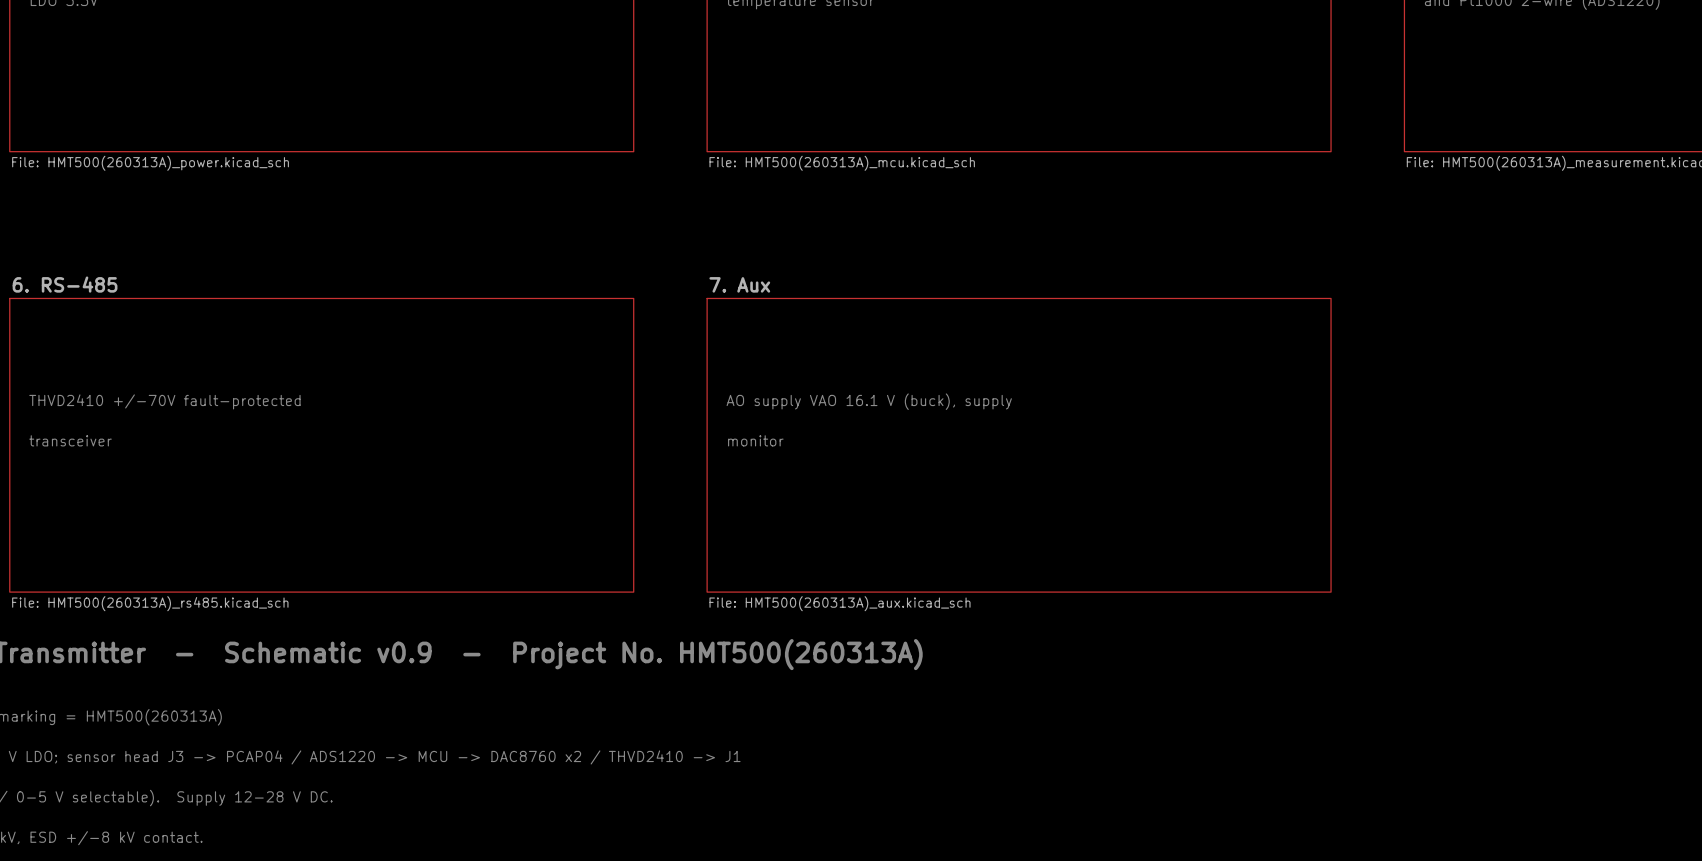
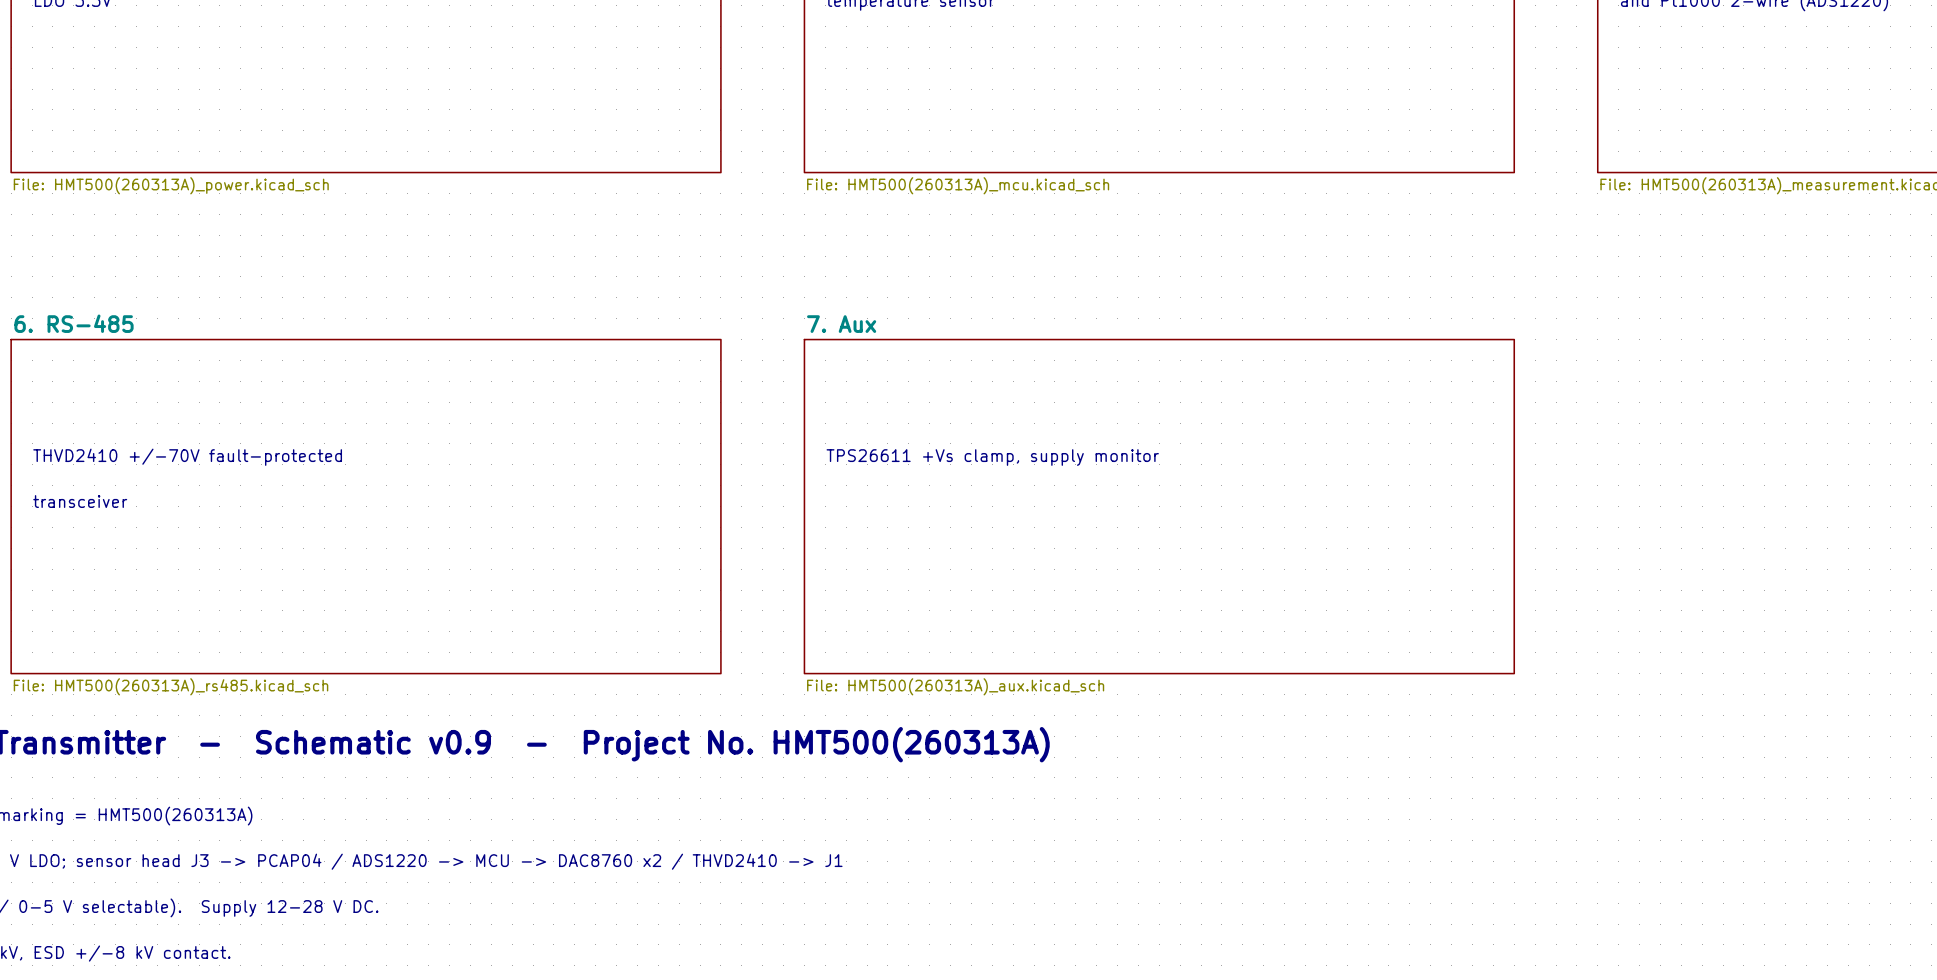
text: AO supply VAO 16.1 V (buck), supply (869, 401) -> TPS26611 +Vs clamp, supply monitor (992, 457)
text: monitor (755, 440) -> none

